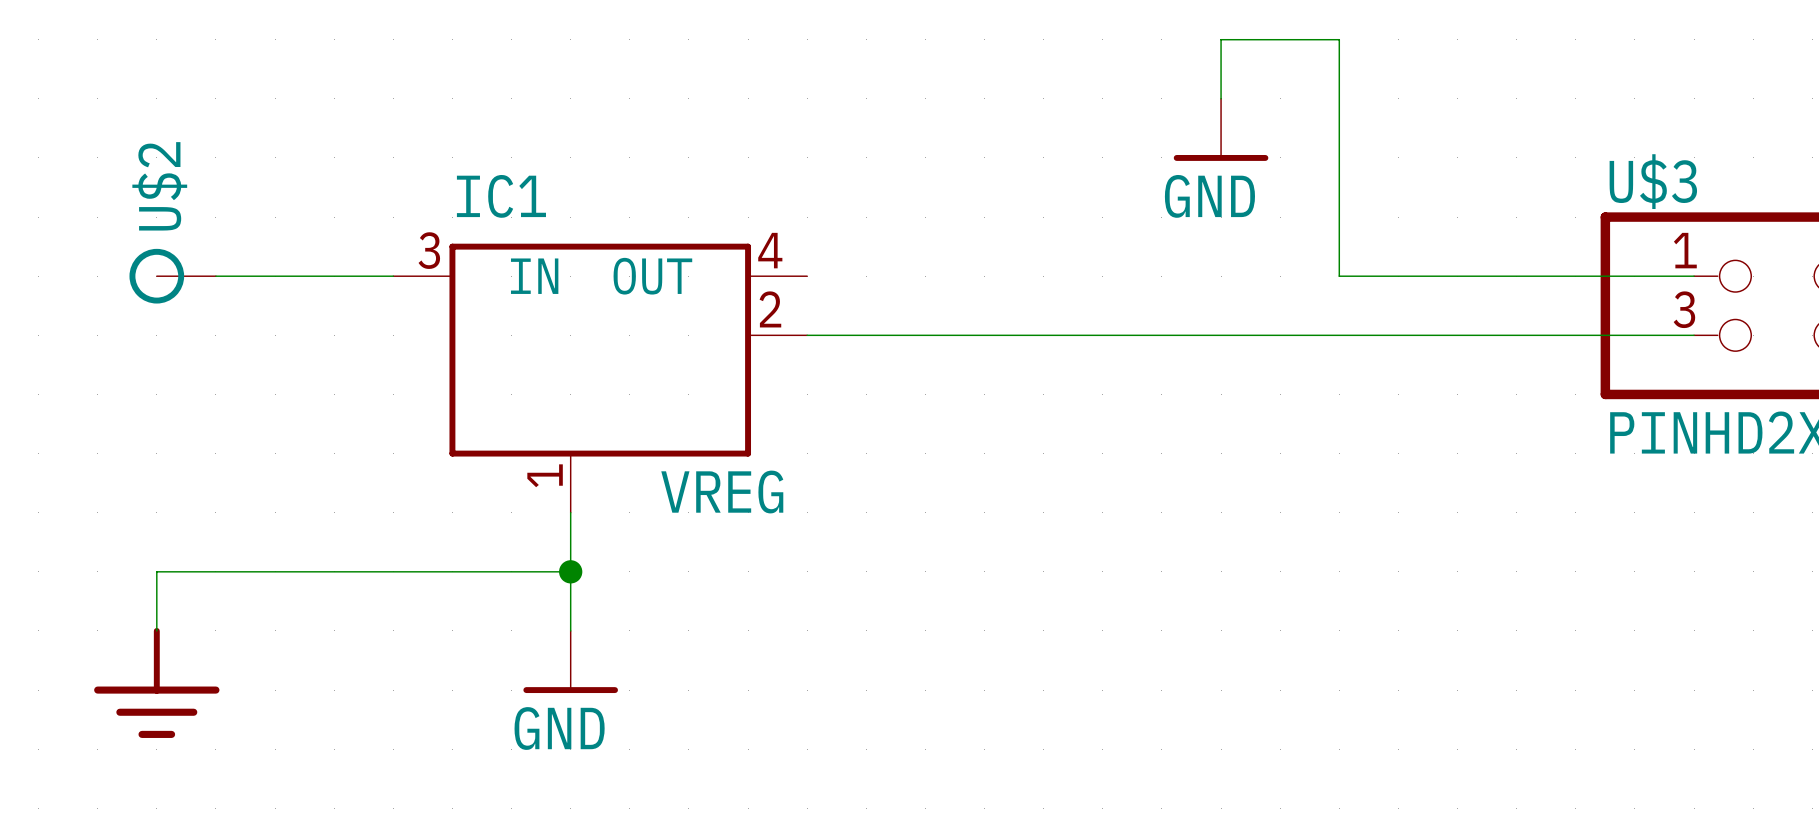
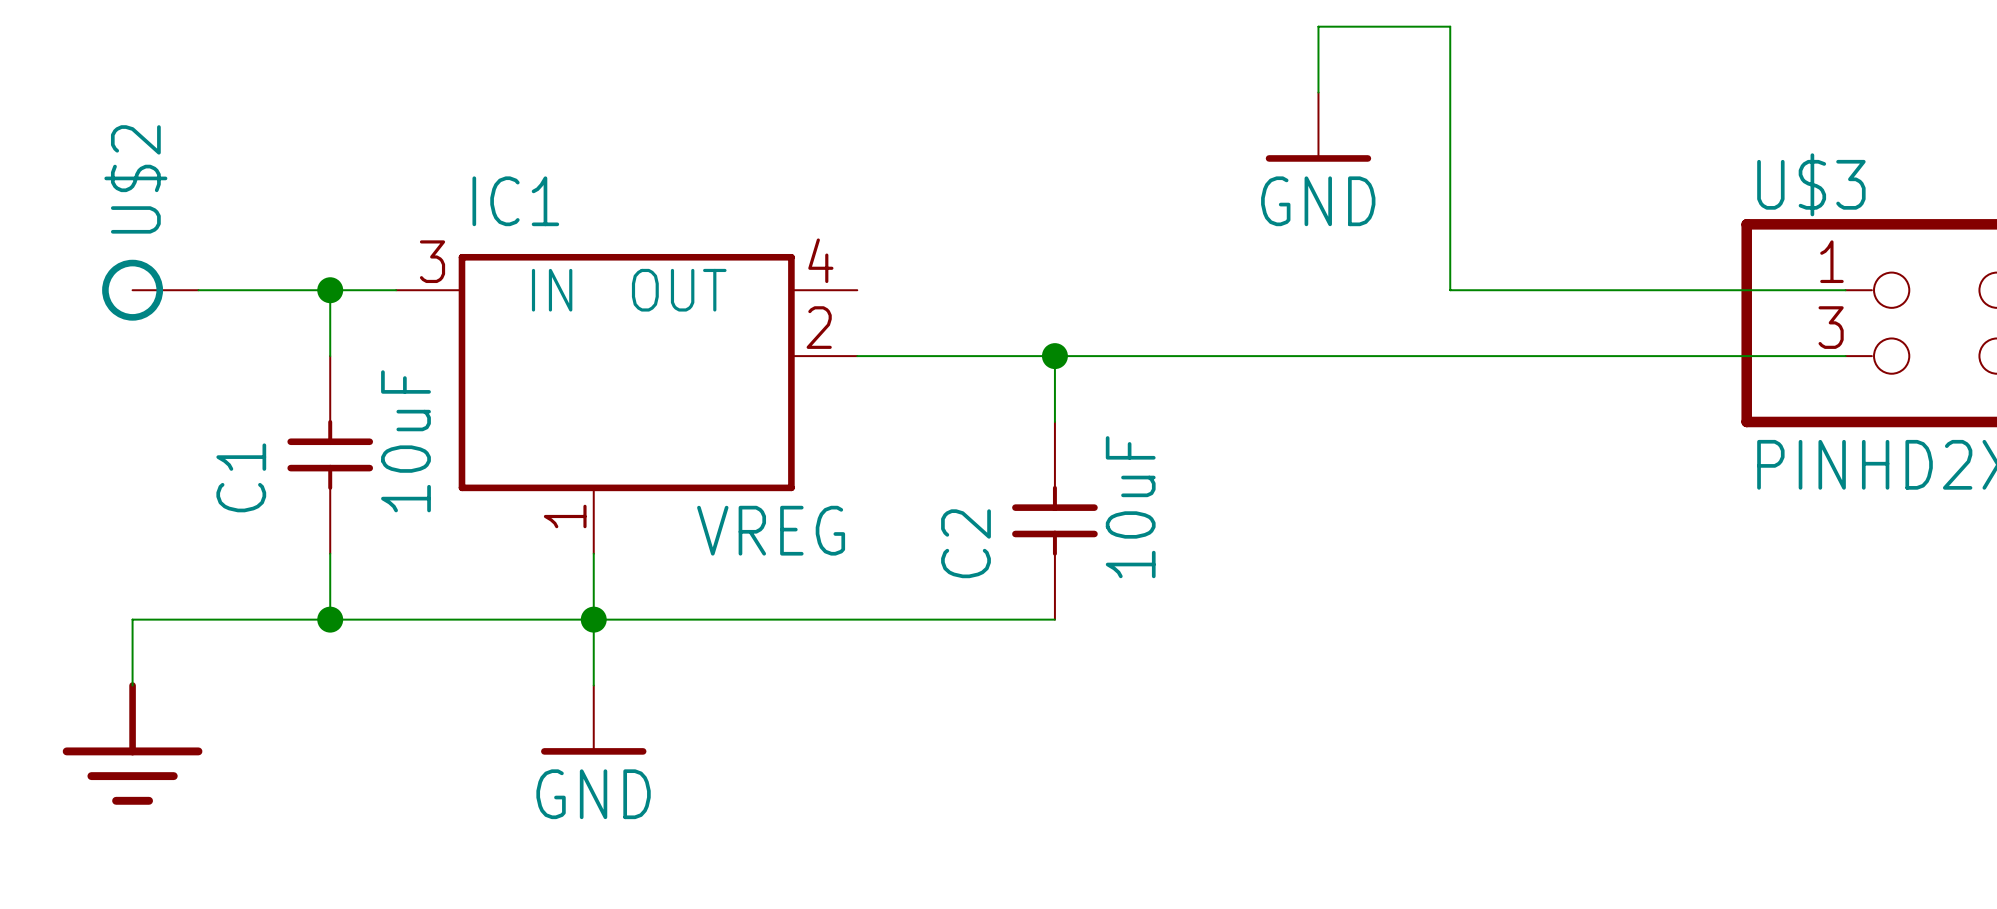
wire: none -> (330, 290) (330, 356)
junction: none -> (330, 290)
wire: none -> (1054, 356) (1054, 421)
junction: none -> (1054, 356)
C1: none -> 10uF (330, 454)
C2: none -> 10uF (1054, 520)
wire: none -> (330, 553) (330, 619)
junction: none -> (330, 619)
wire: none -> (593, 619) (1054, 619)

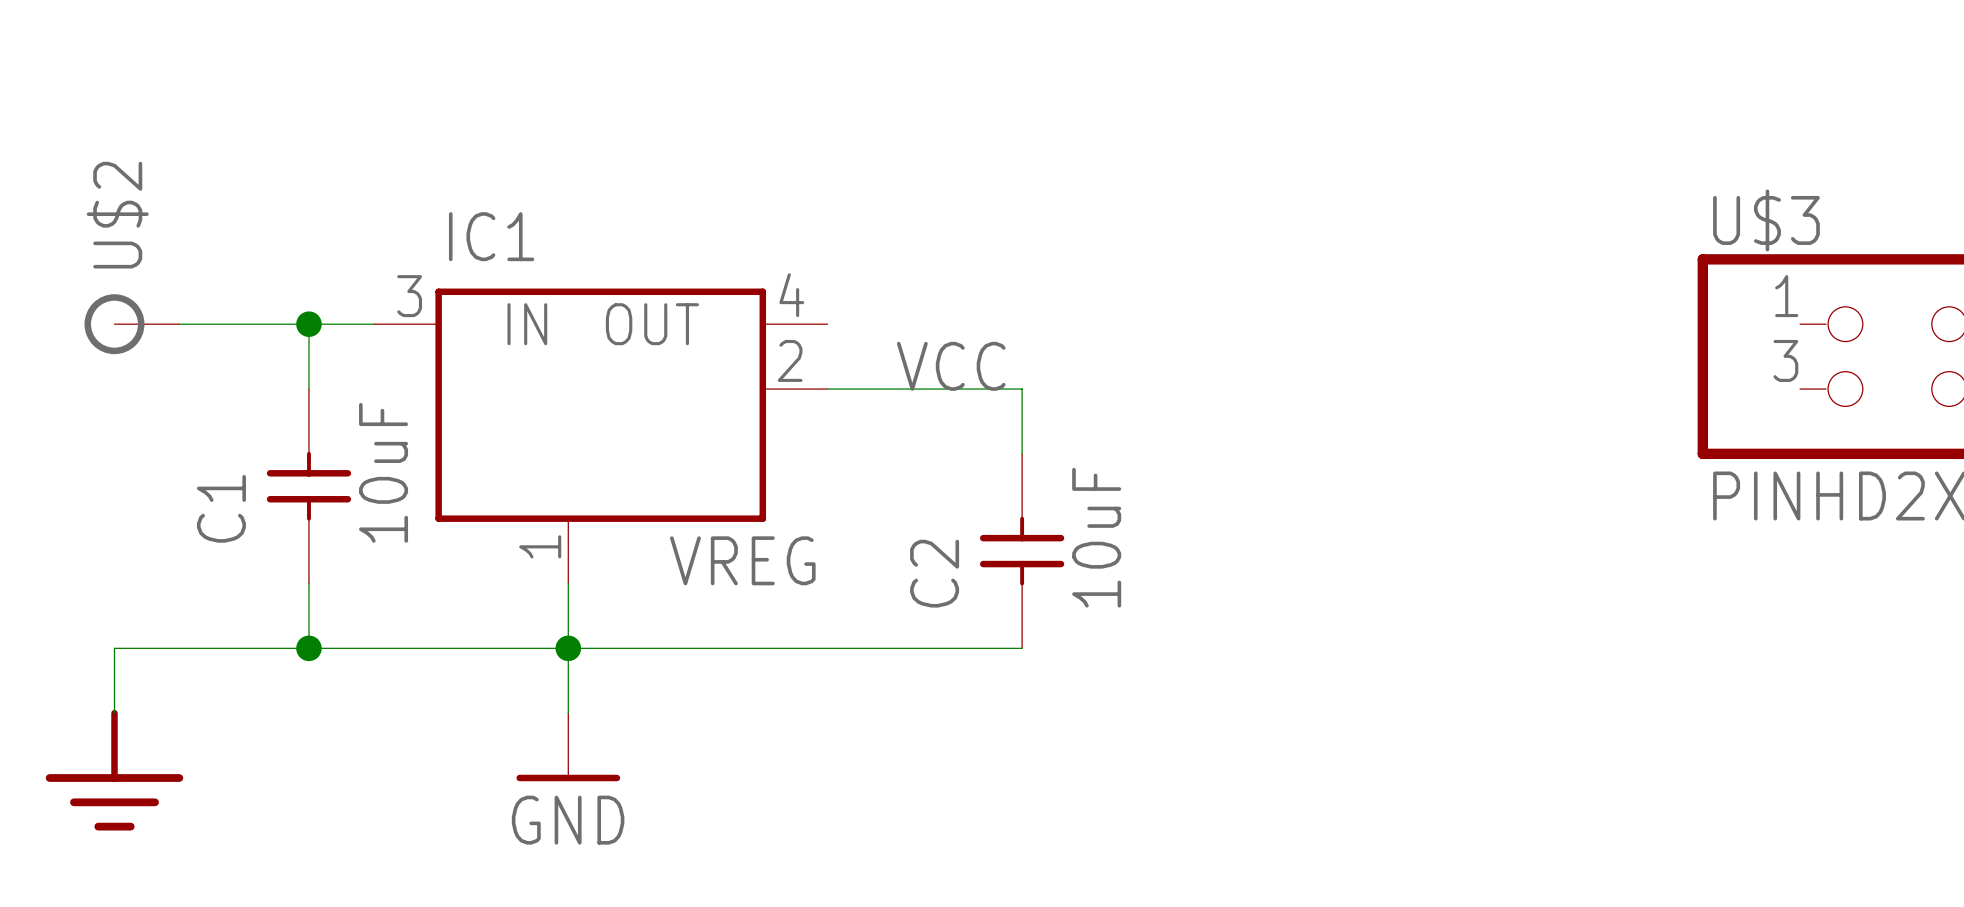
wire: (1318, 92) (1318, 26) (1450, 26) (1450, 290) (1845, 290) -> none
power symbol: GND (1318, 127) -> none
label: none -> VCC (951, 366)
wire: (1054, 356) (1845, 356) -> none
junction: (1054, 356) -> none

